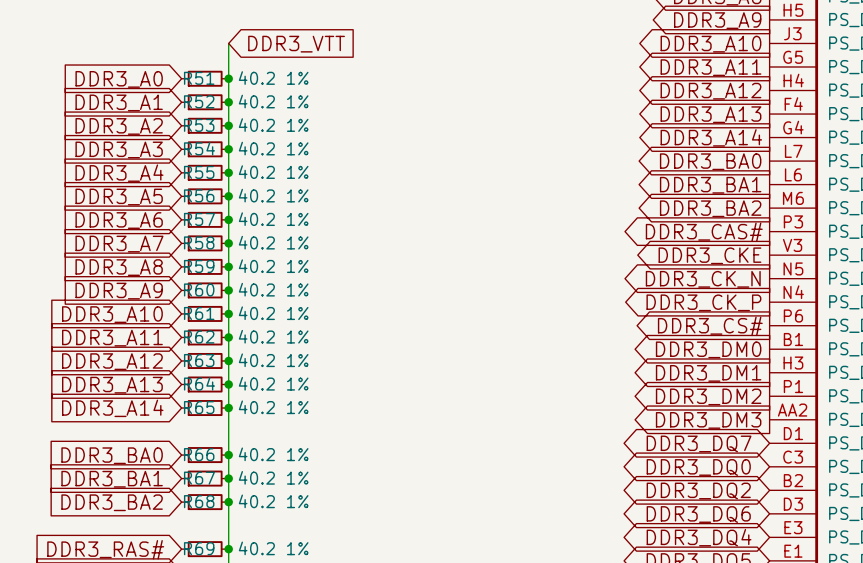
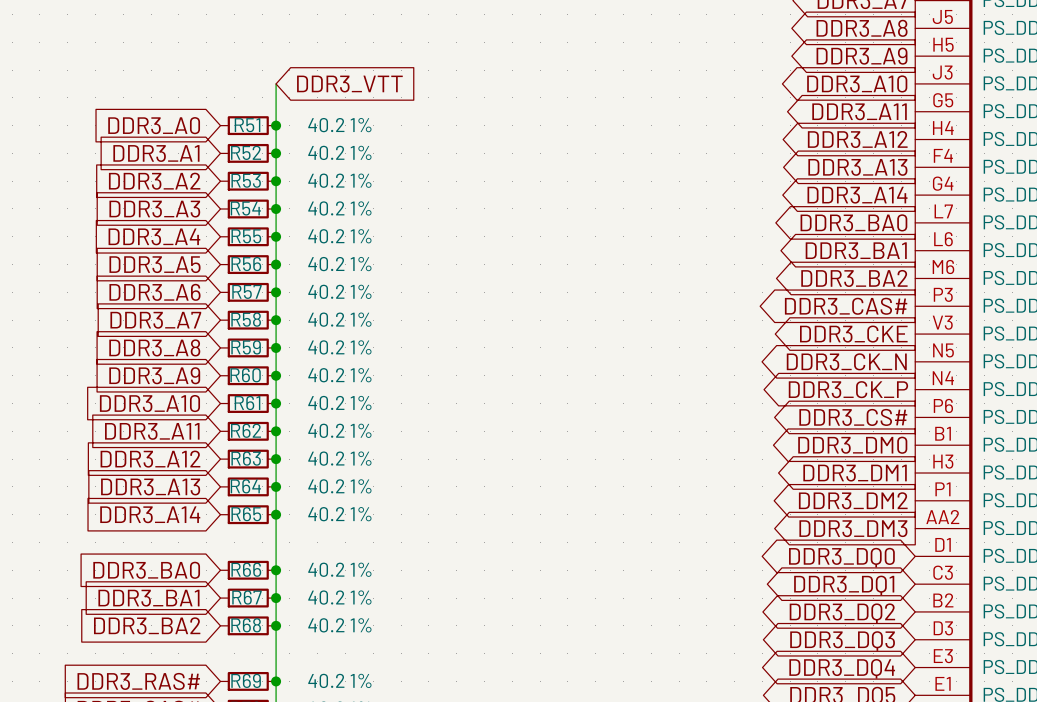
global label: DDR3_DQ7 (699, 443) -> DDR3_DQ0 (841, 557)
global label: DDR3_DQ0 (698, 467) -> DDR3_DQ1 (844, 585)
global label: DDR3_DQ6 (698, 514) -> DDR3_DQ3 (842, 641)

